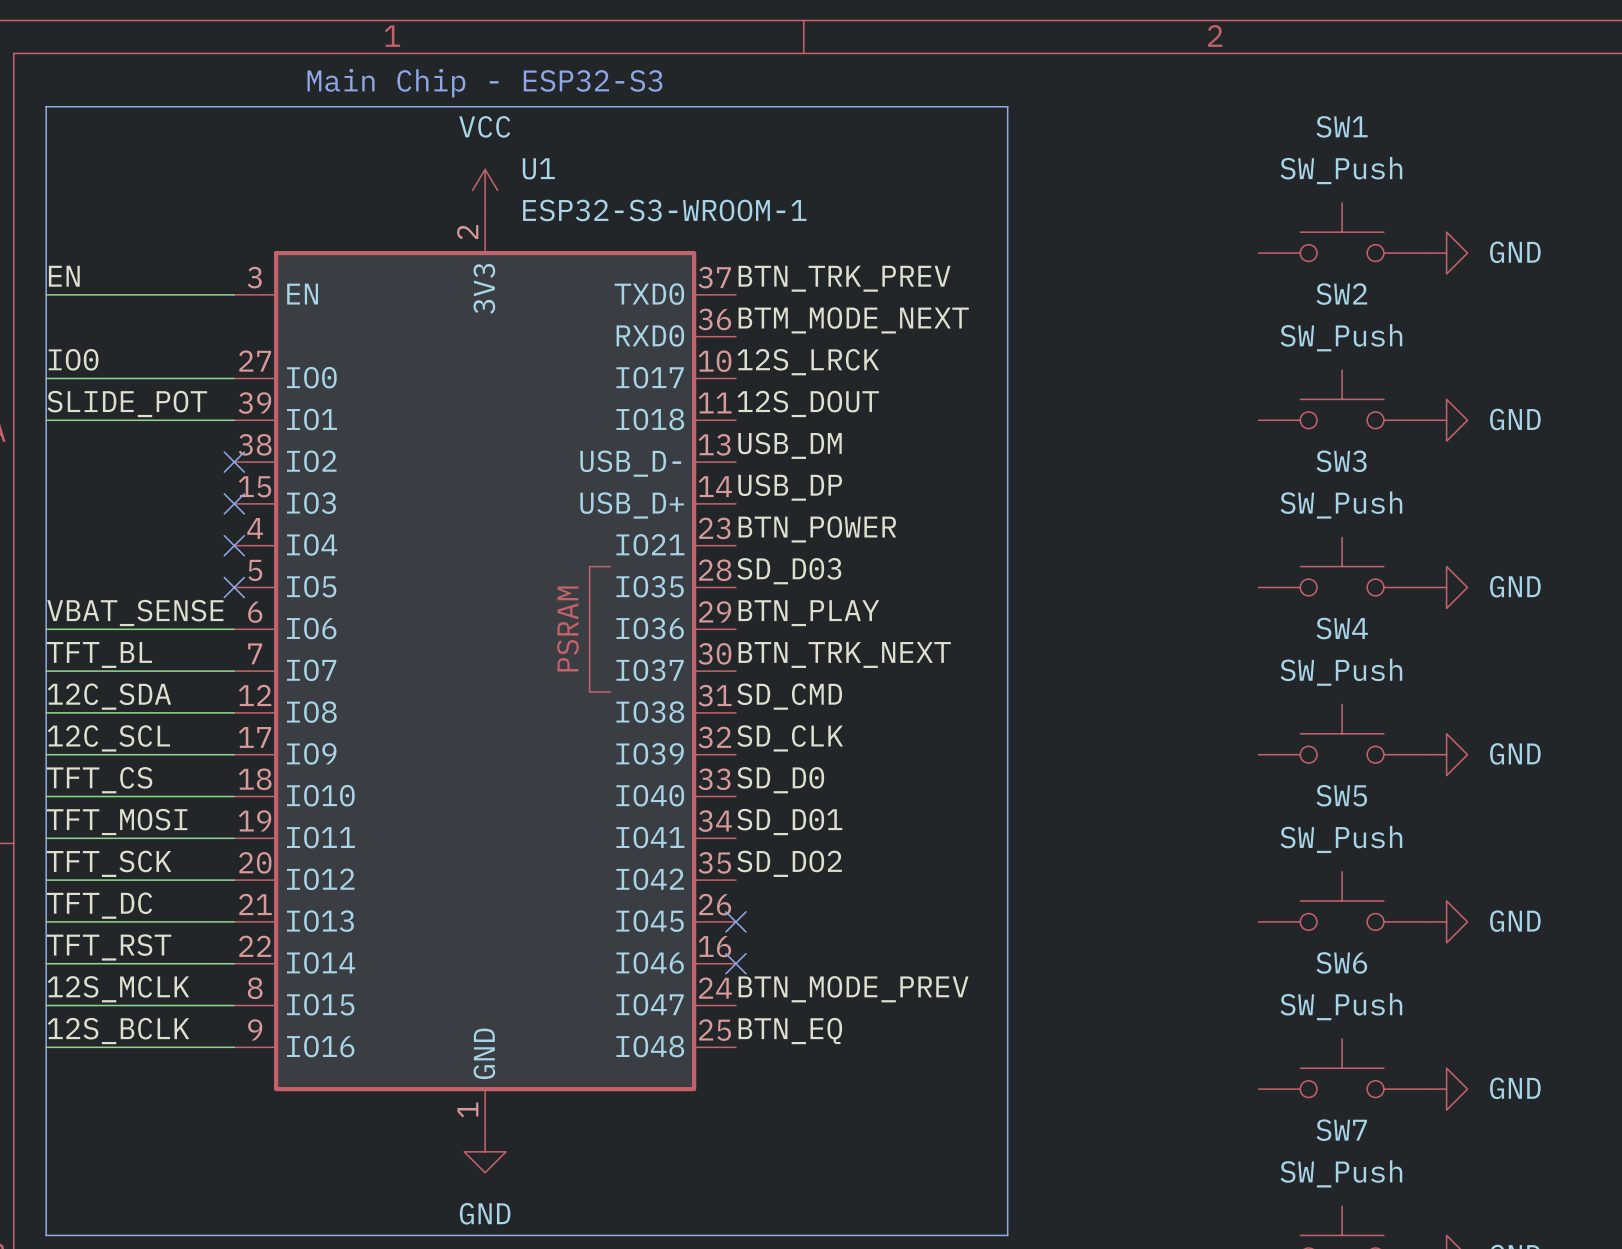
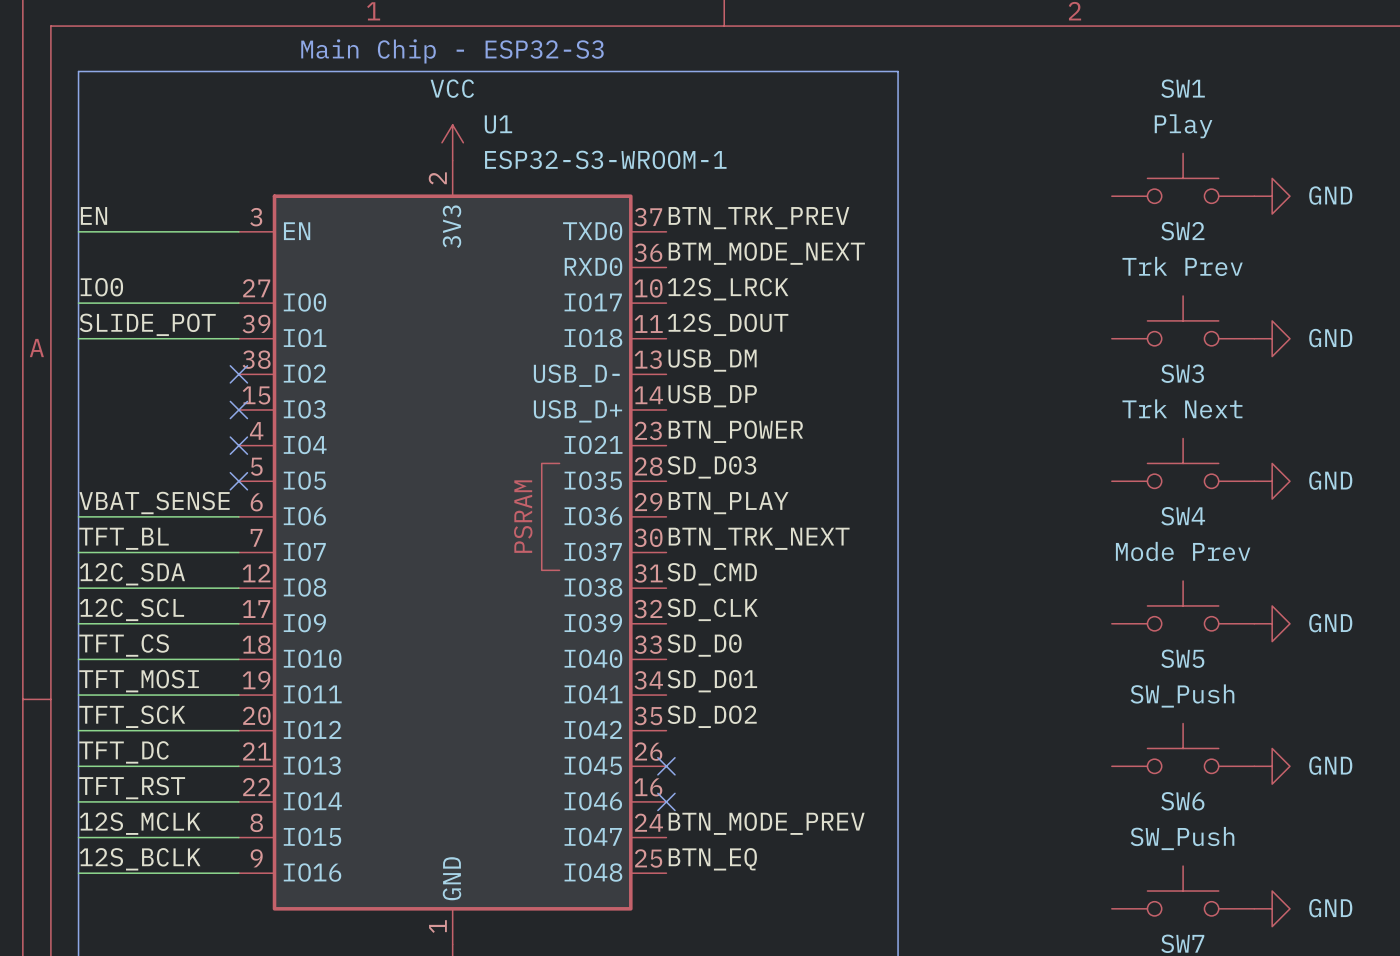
SW1 value: SW_Push (1341, 170) -> Play (1183, 126)
SW2 value: SW_Push (1341, 337) -> Trk Prev (1182, 266)
SW3 value: SW_Push (1341, 505) -> Trk Next (1182, 408)
SW4 value: SW_Push (1341, 672) -> Mode Prev (1183, 551)

